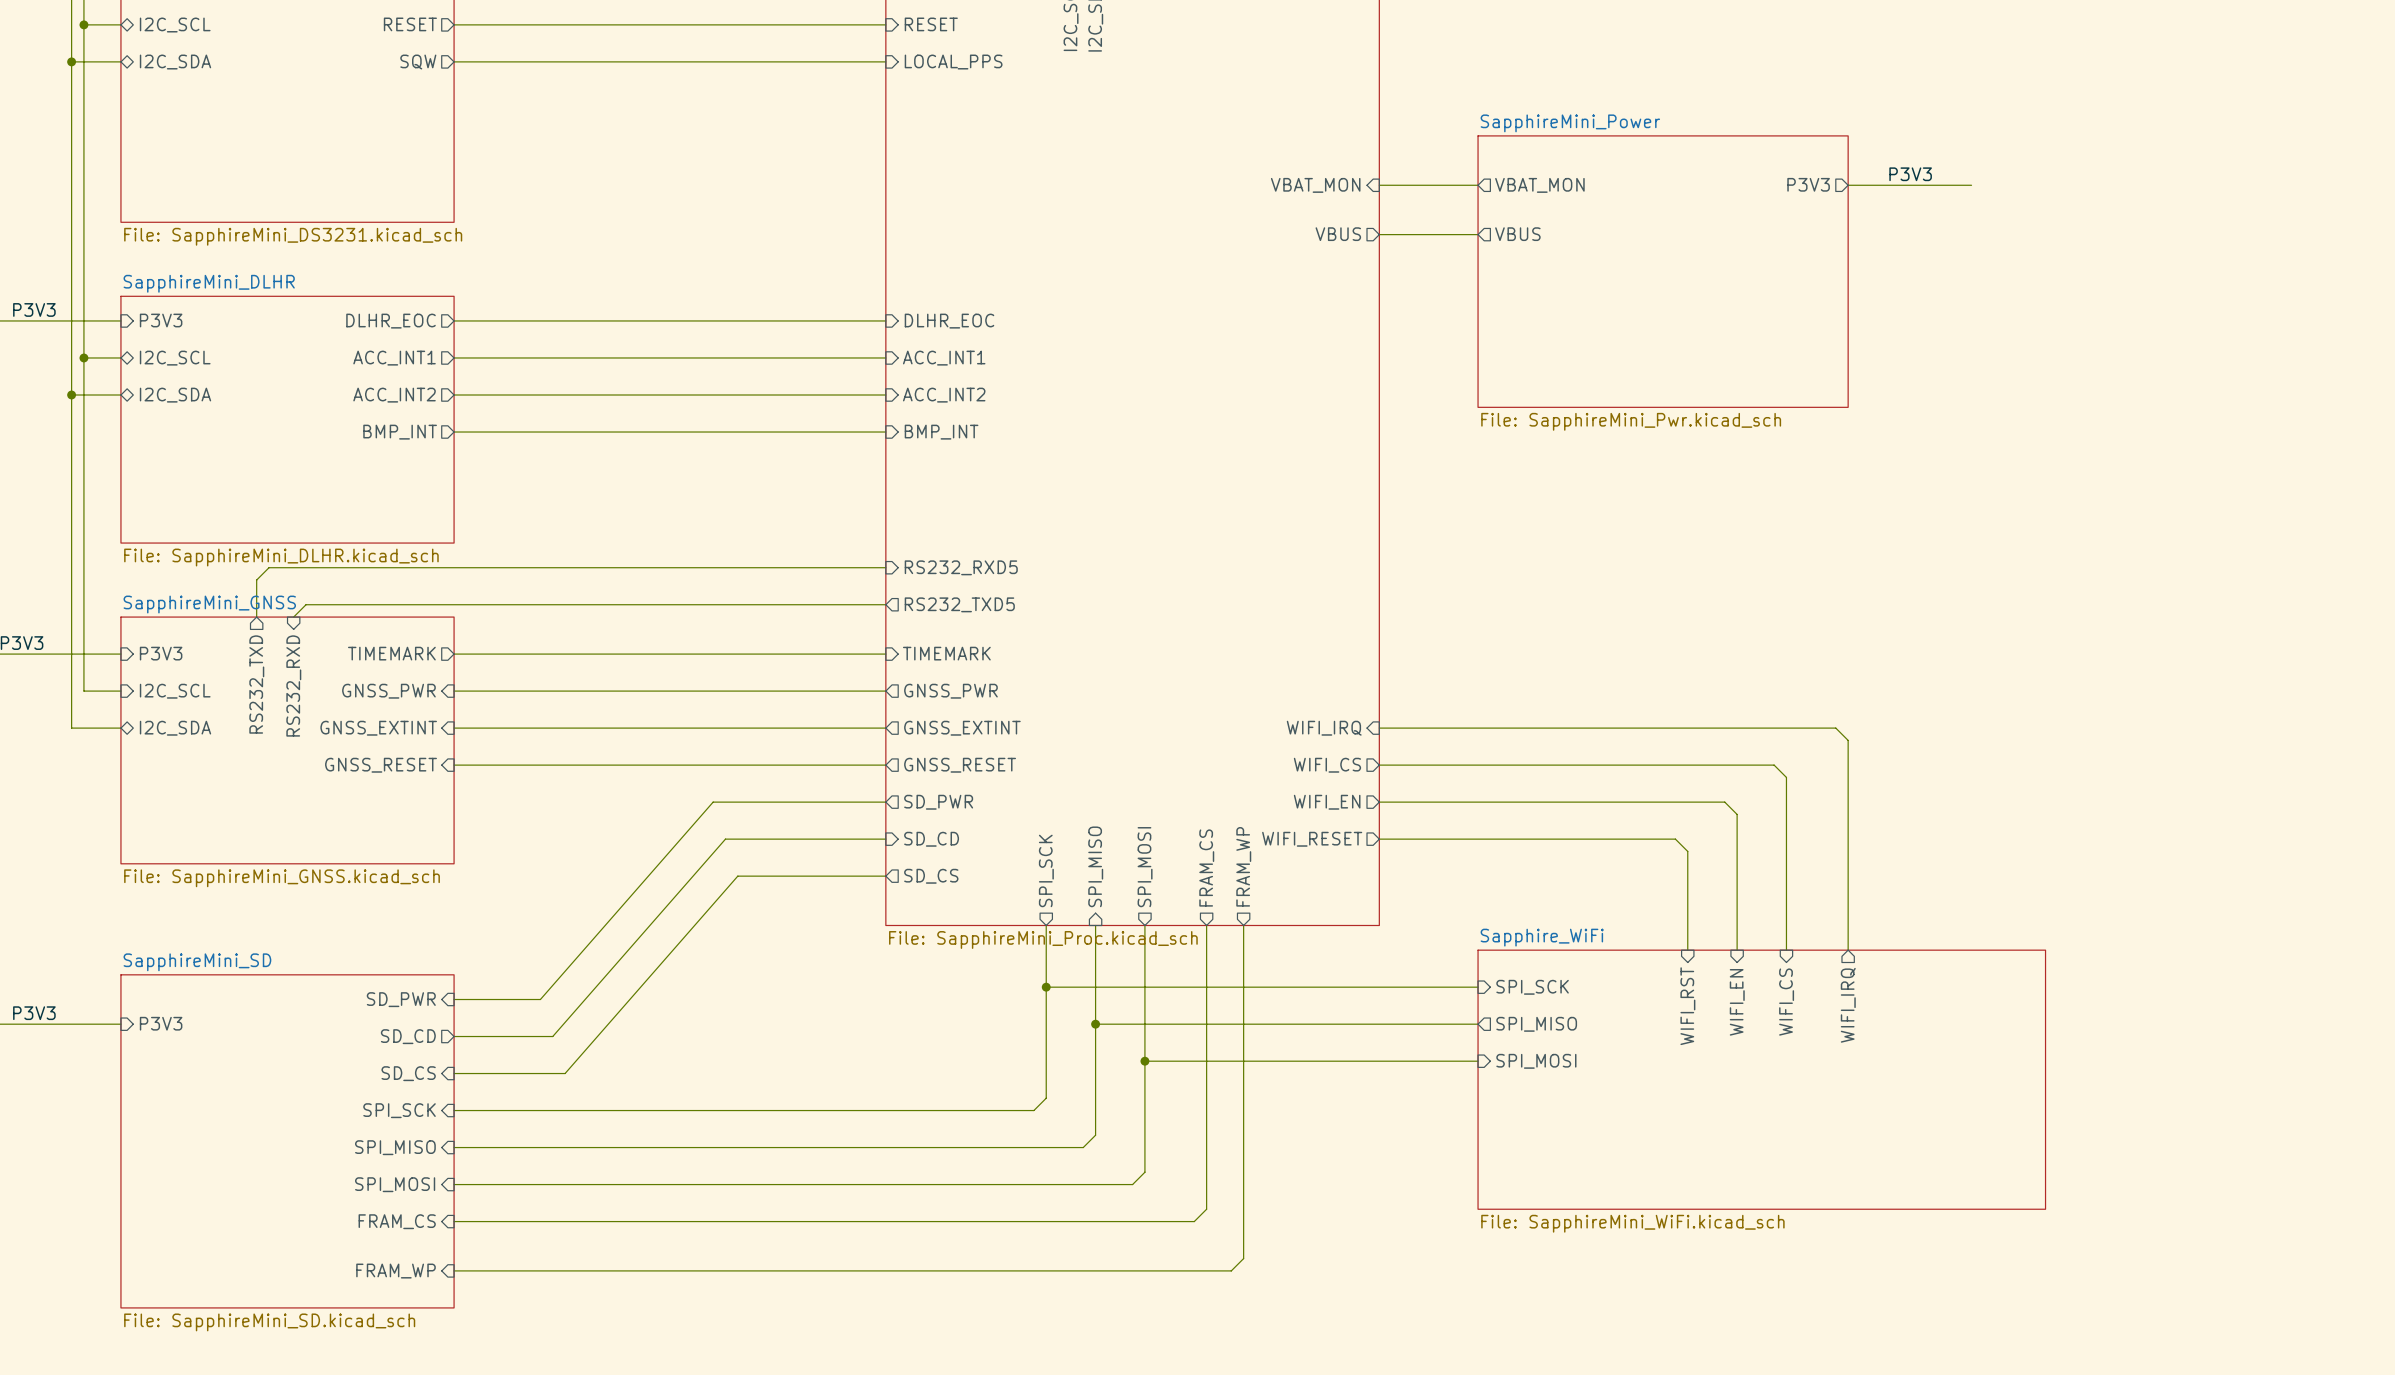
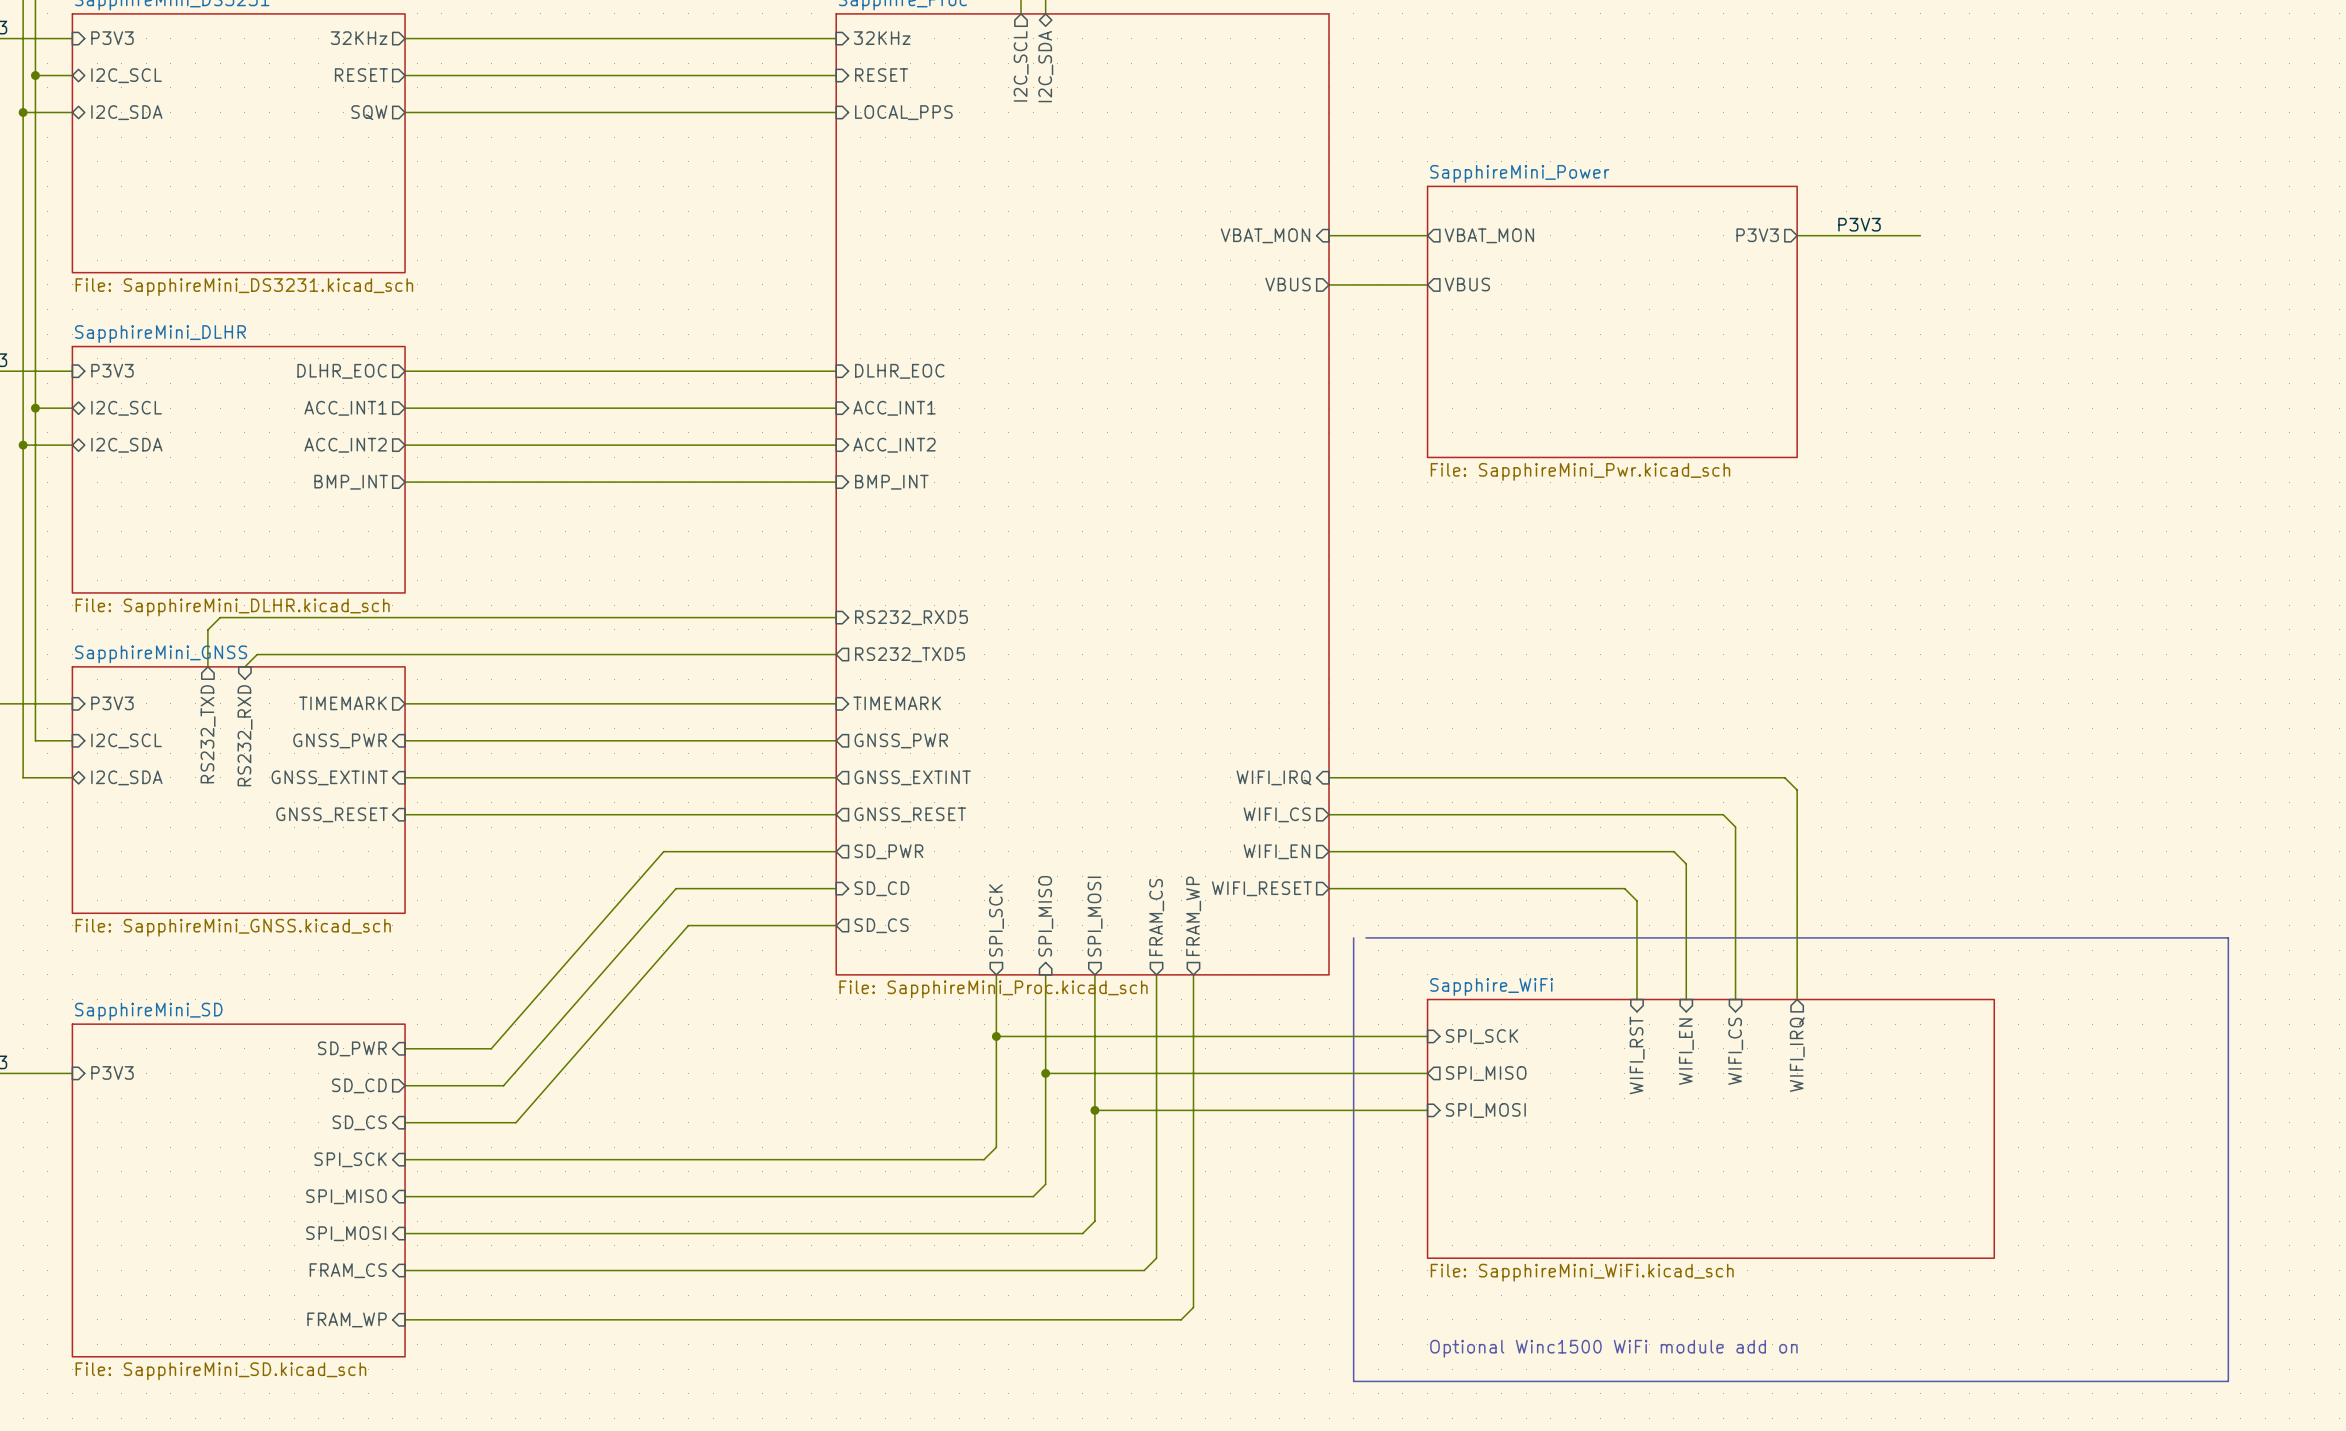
line: none -> (1353, 937) (1353, 1381) (2228, 1381) (2228, 937) (1365, 937)
text: none -> Optional Winc1500 WiFi module add on (1613, 1348)

